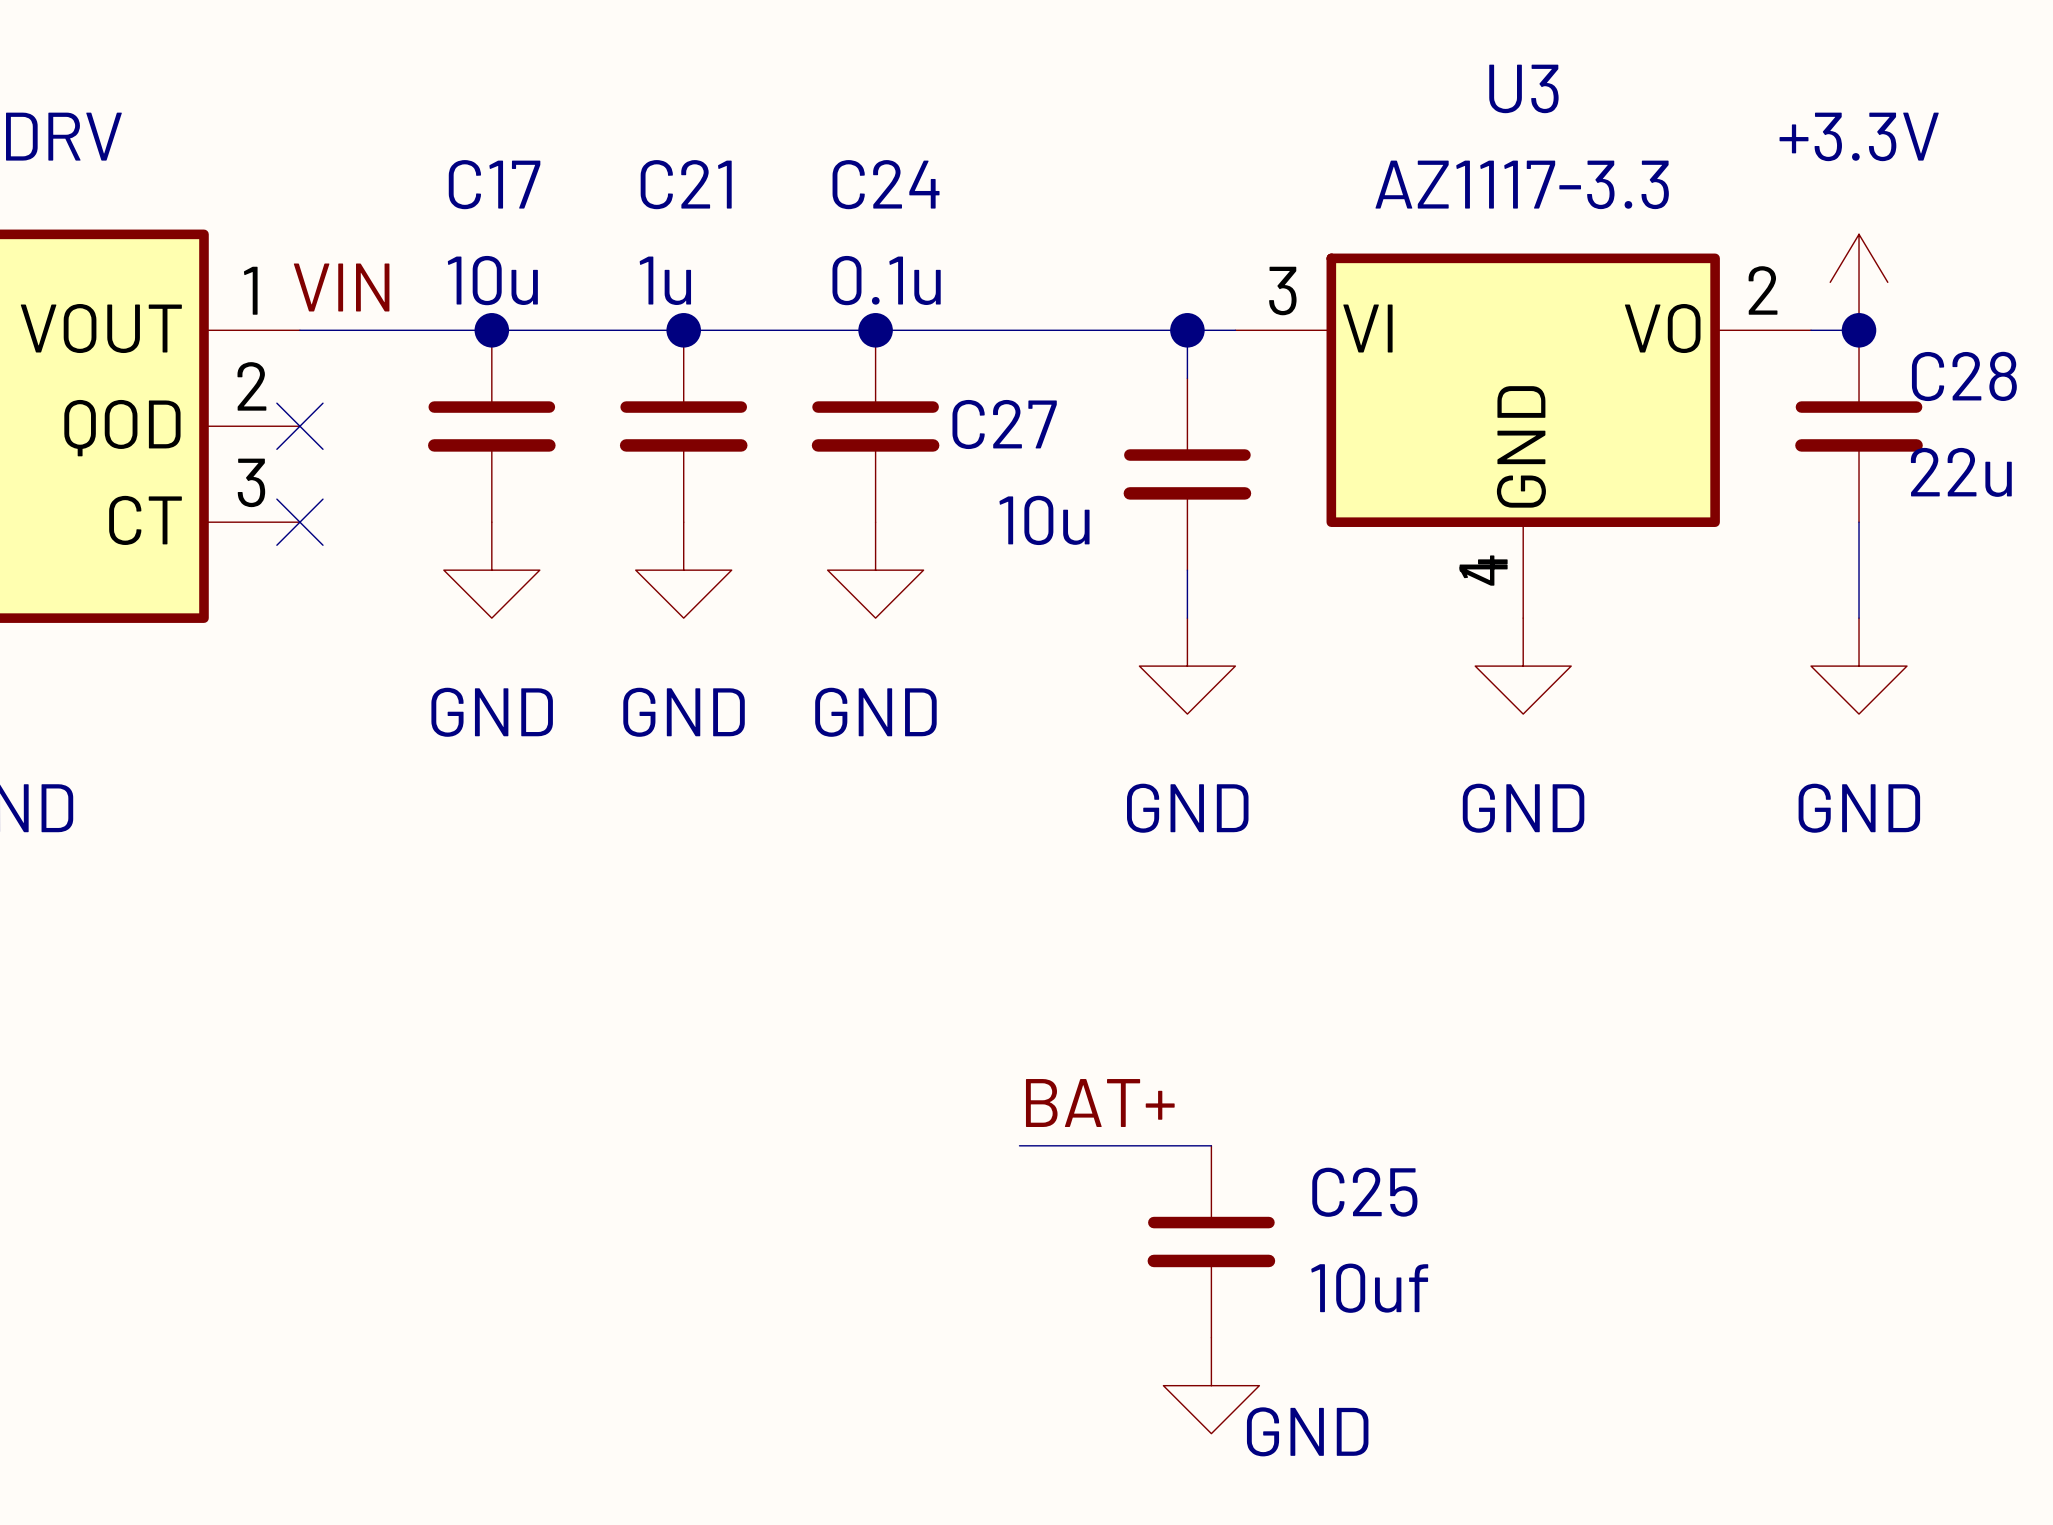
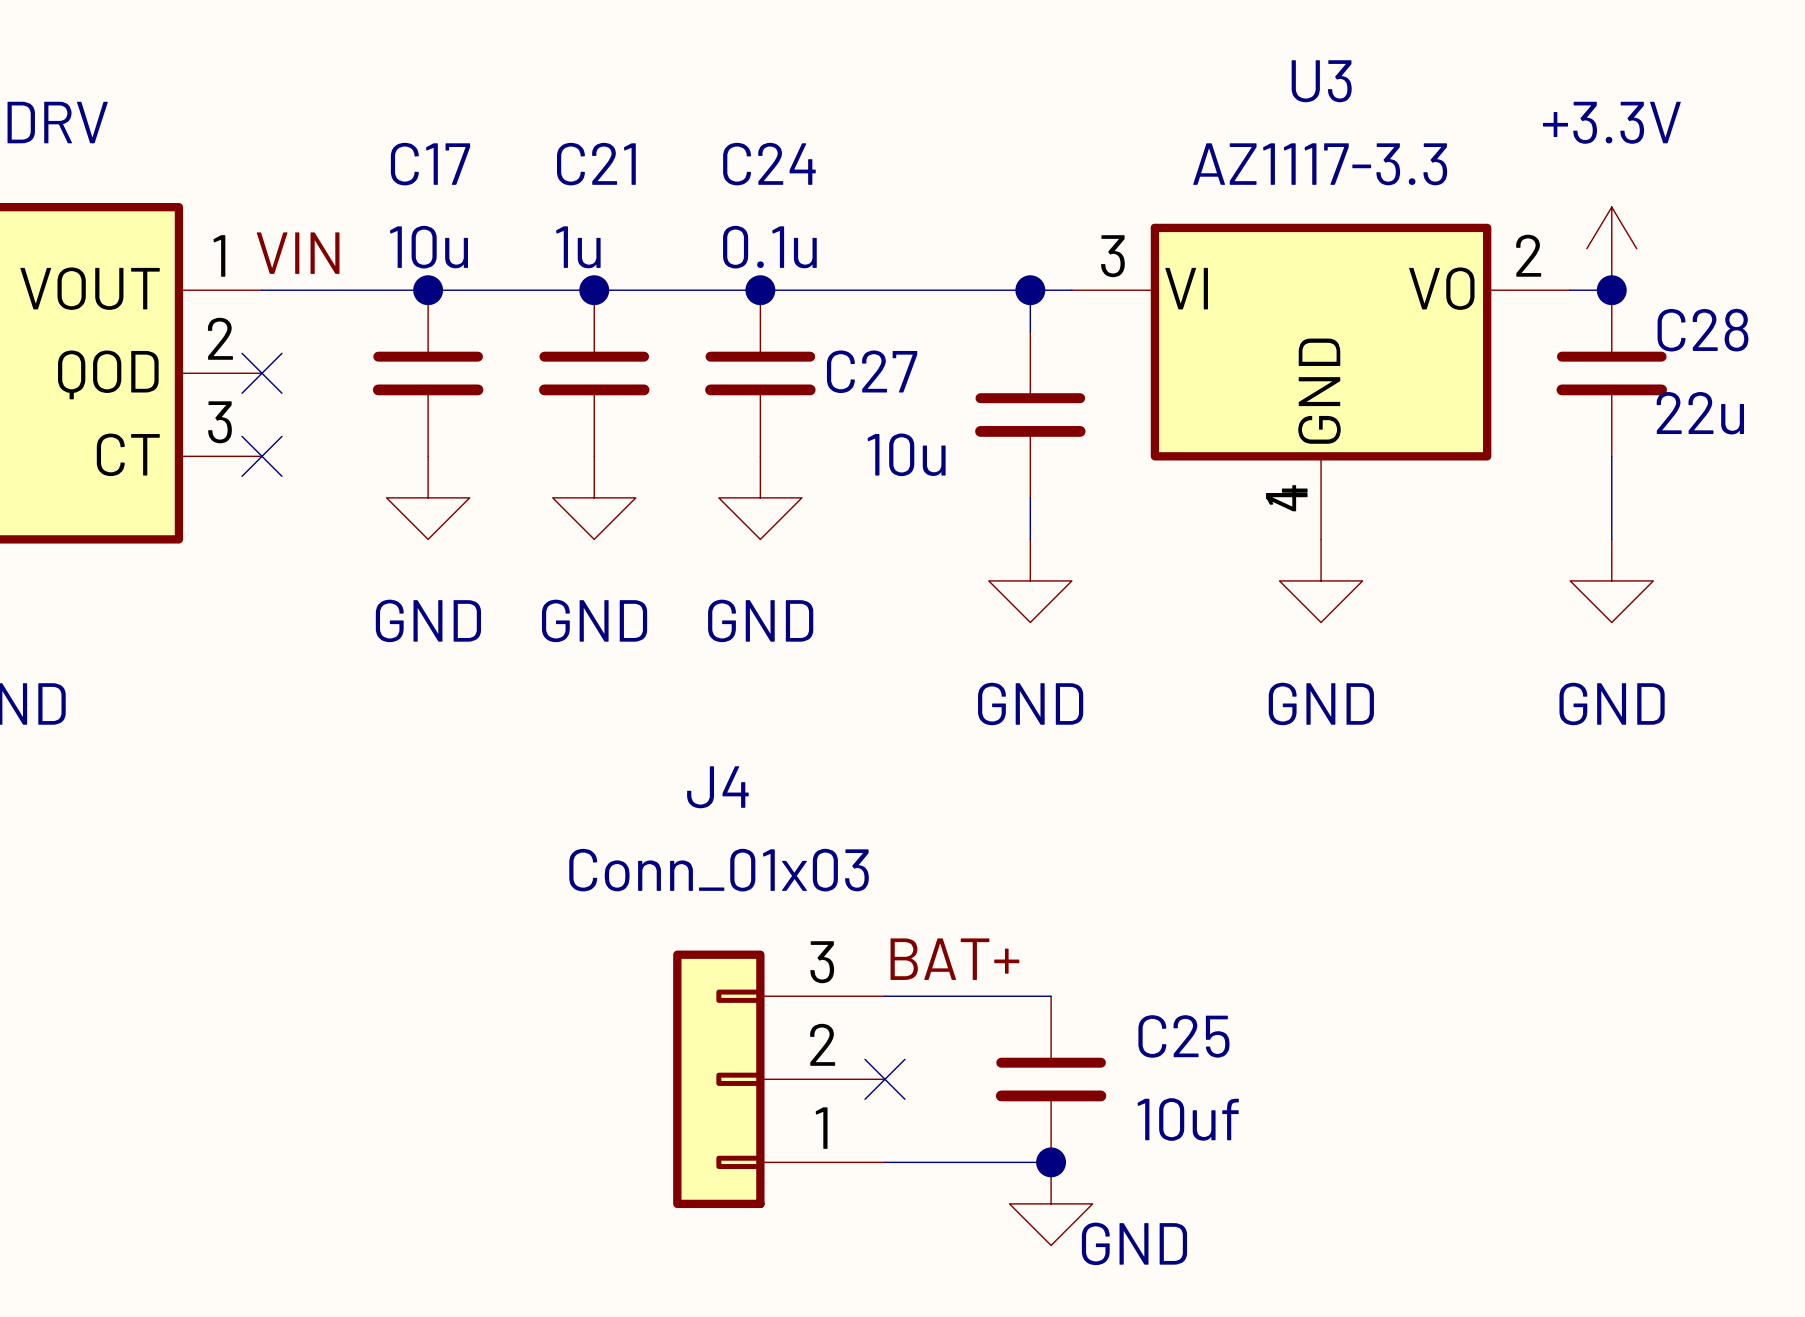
J4: none -> Conn_01x03 (779, 1079)
no-connect mark: none -> (884, 1079)
wire: none -> (884, 1162) (1051, 1162)
junction: none -> (1051, 1162)

